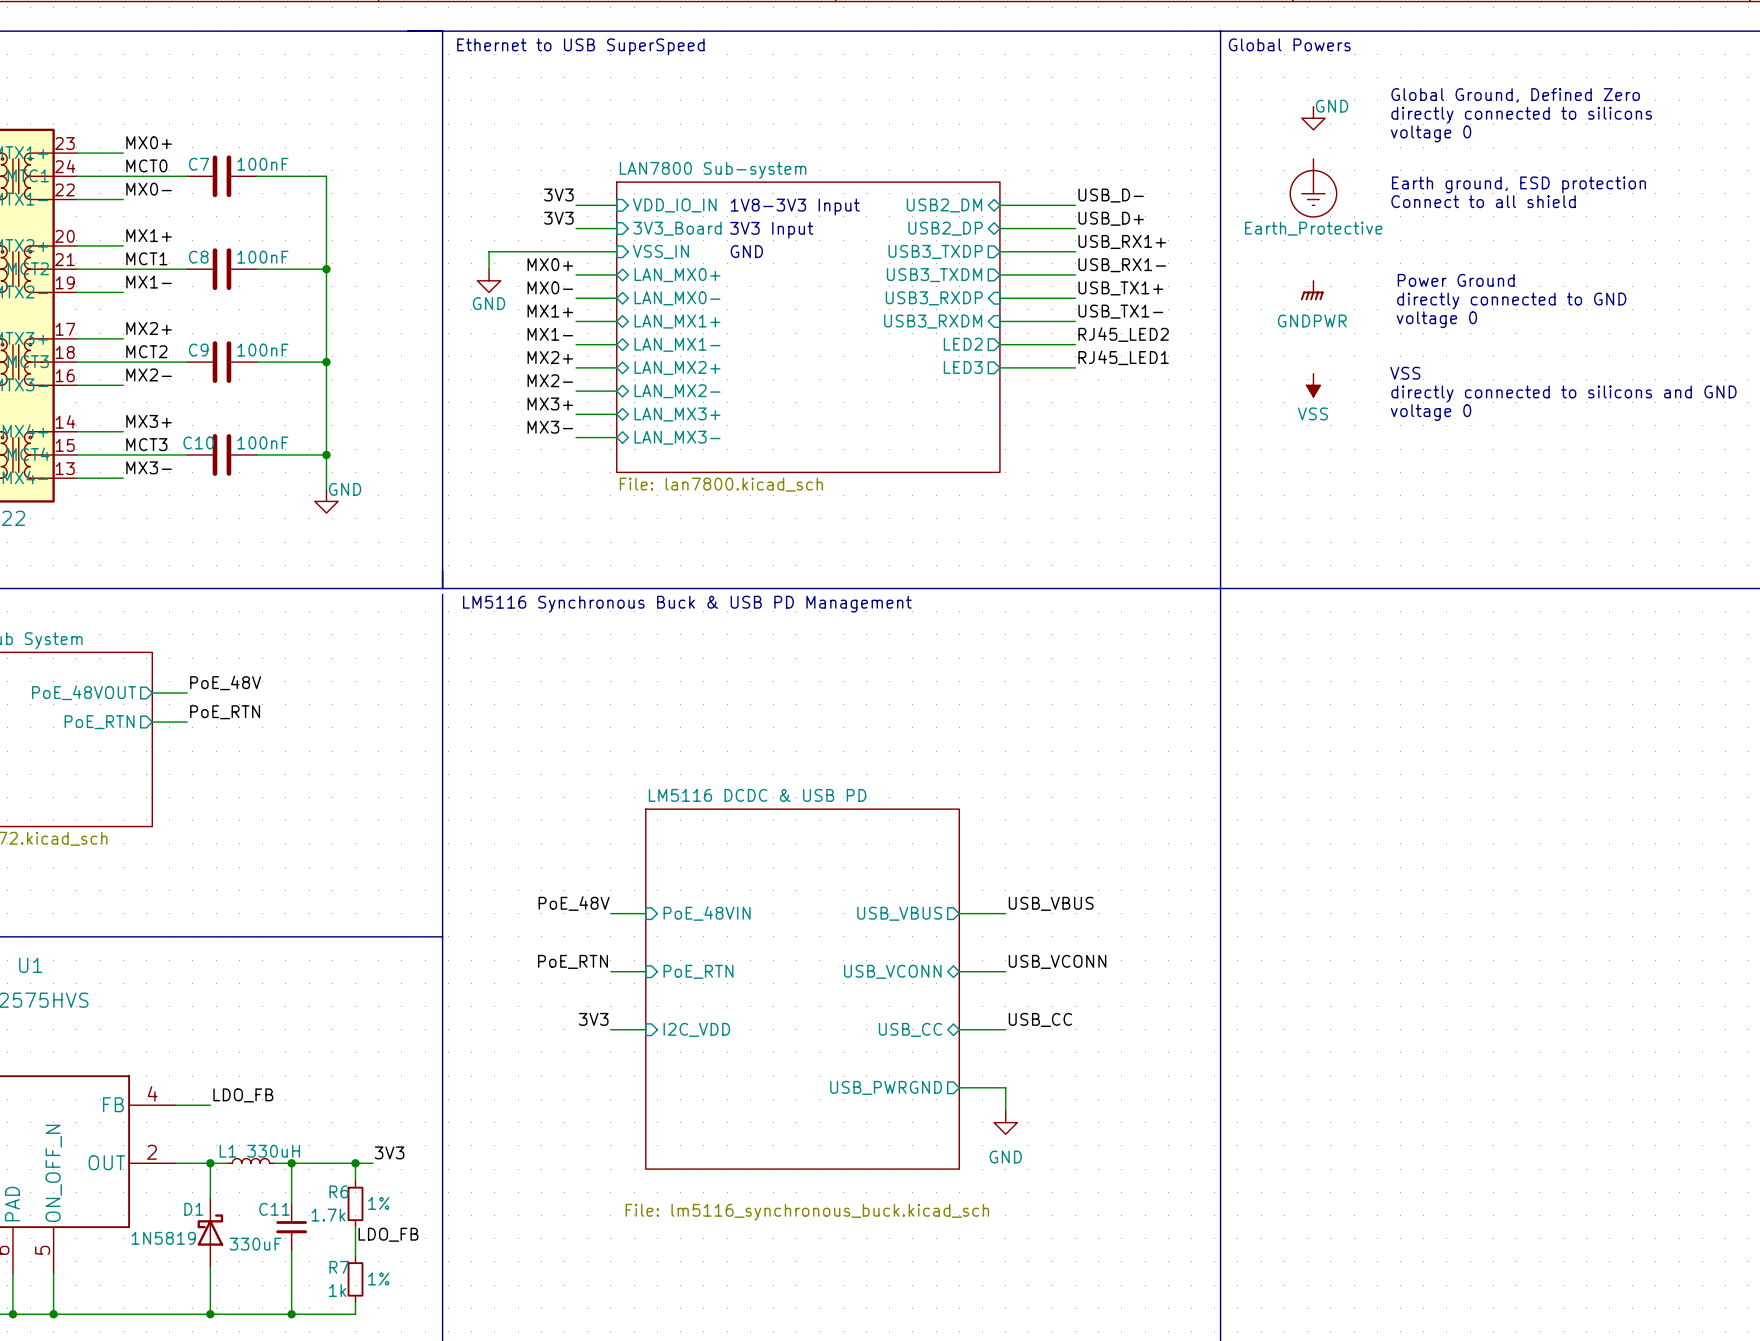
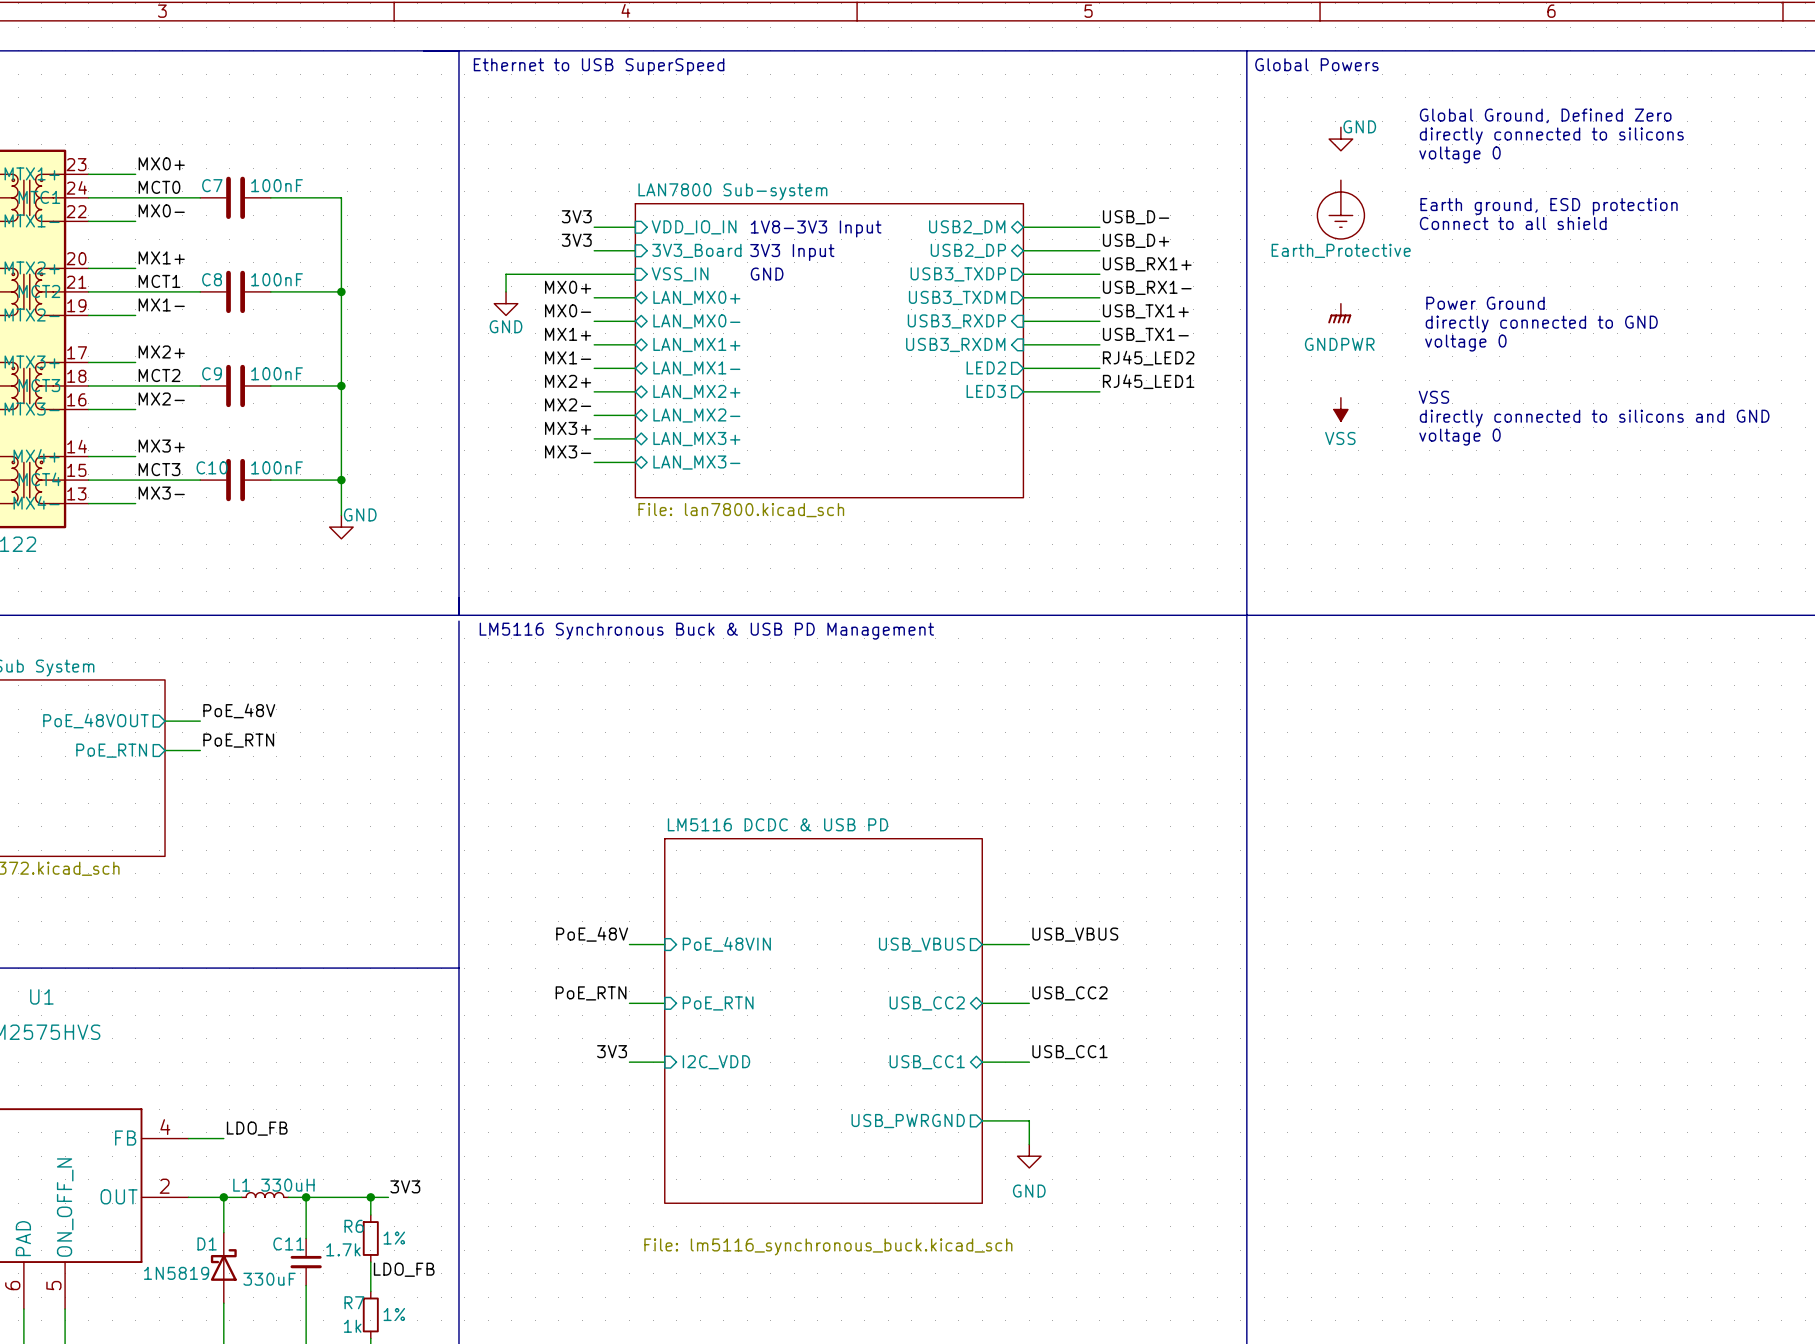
label: USB_VCONN (1057, 961) -> USB_CC2 (1069, 993)
sheet pin: USB_VCONN (892, 971) -> USB_CC2 (927, 1003)
label: USB_CC (1040, 1019) -> USB_CC1 (1069, 1052)
sheet pin: USB_CC (910, 1029) -> USB_CC1 (927, 1062)

